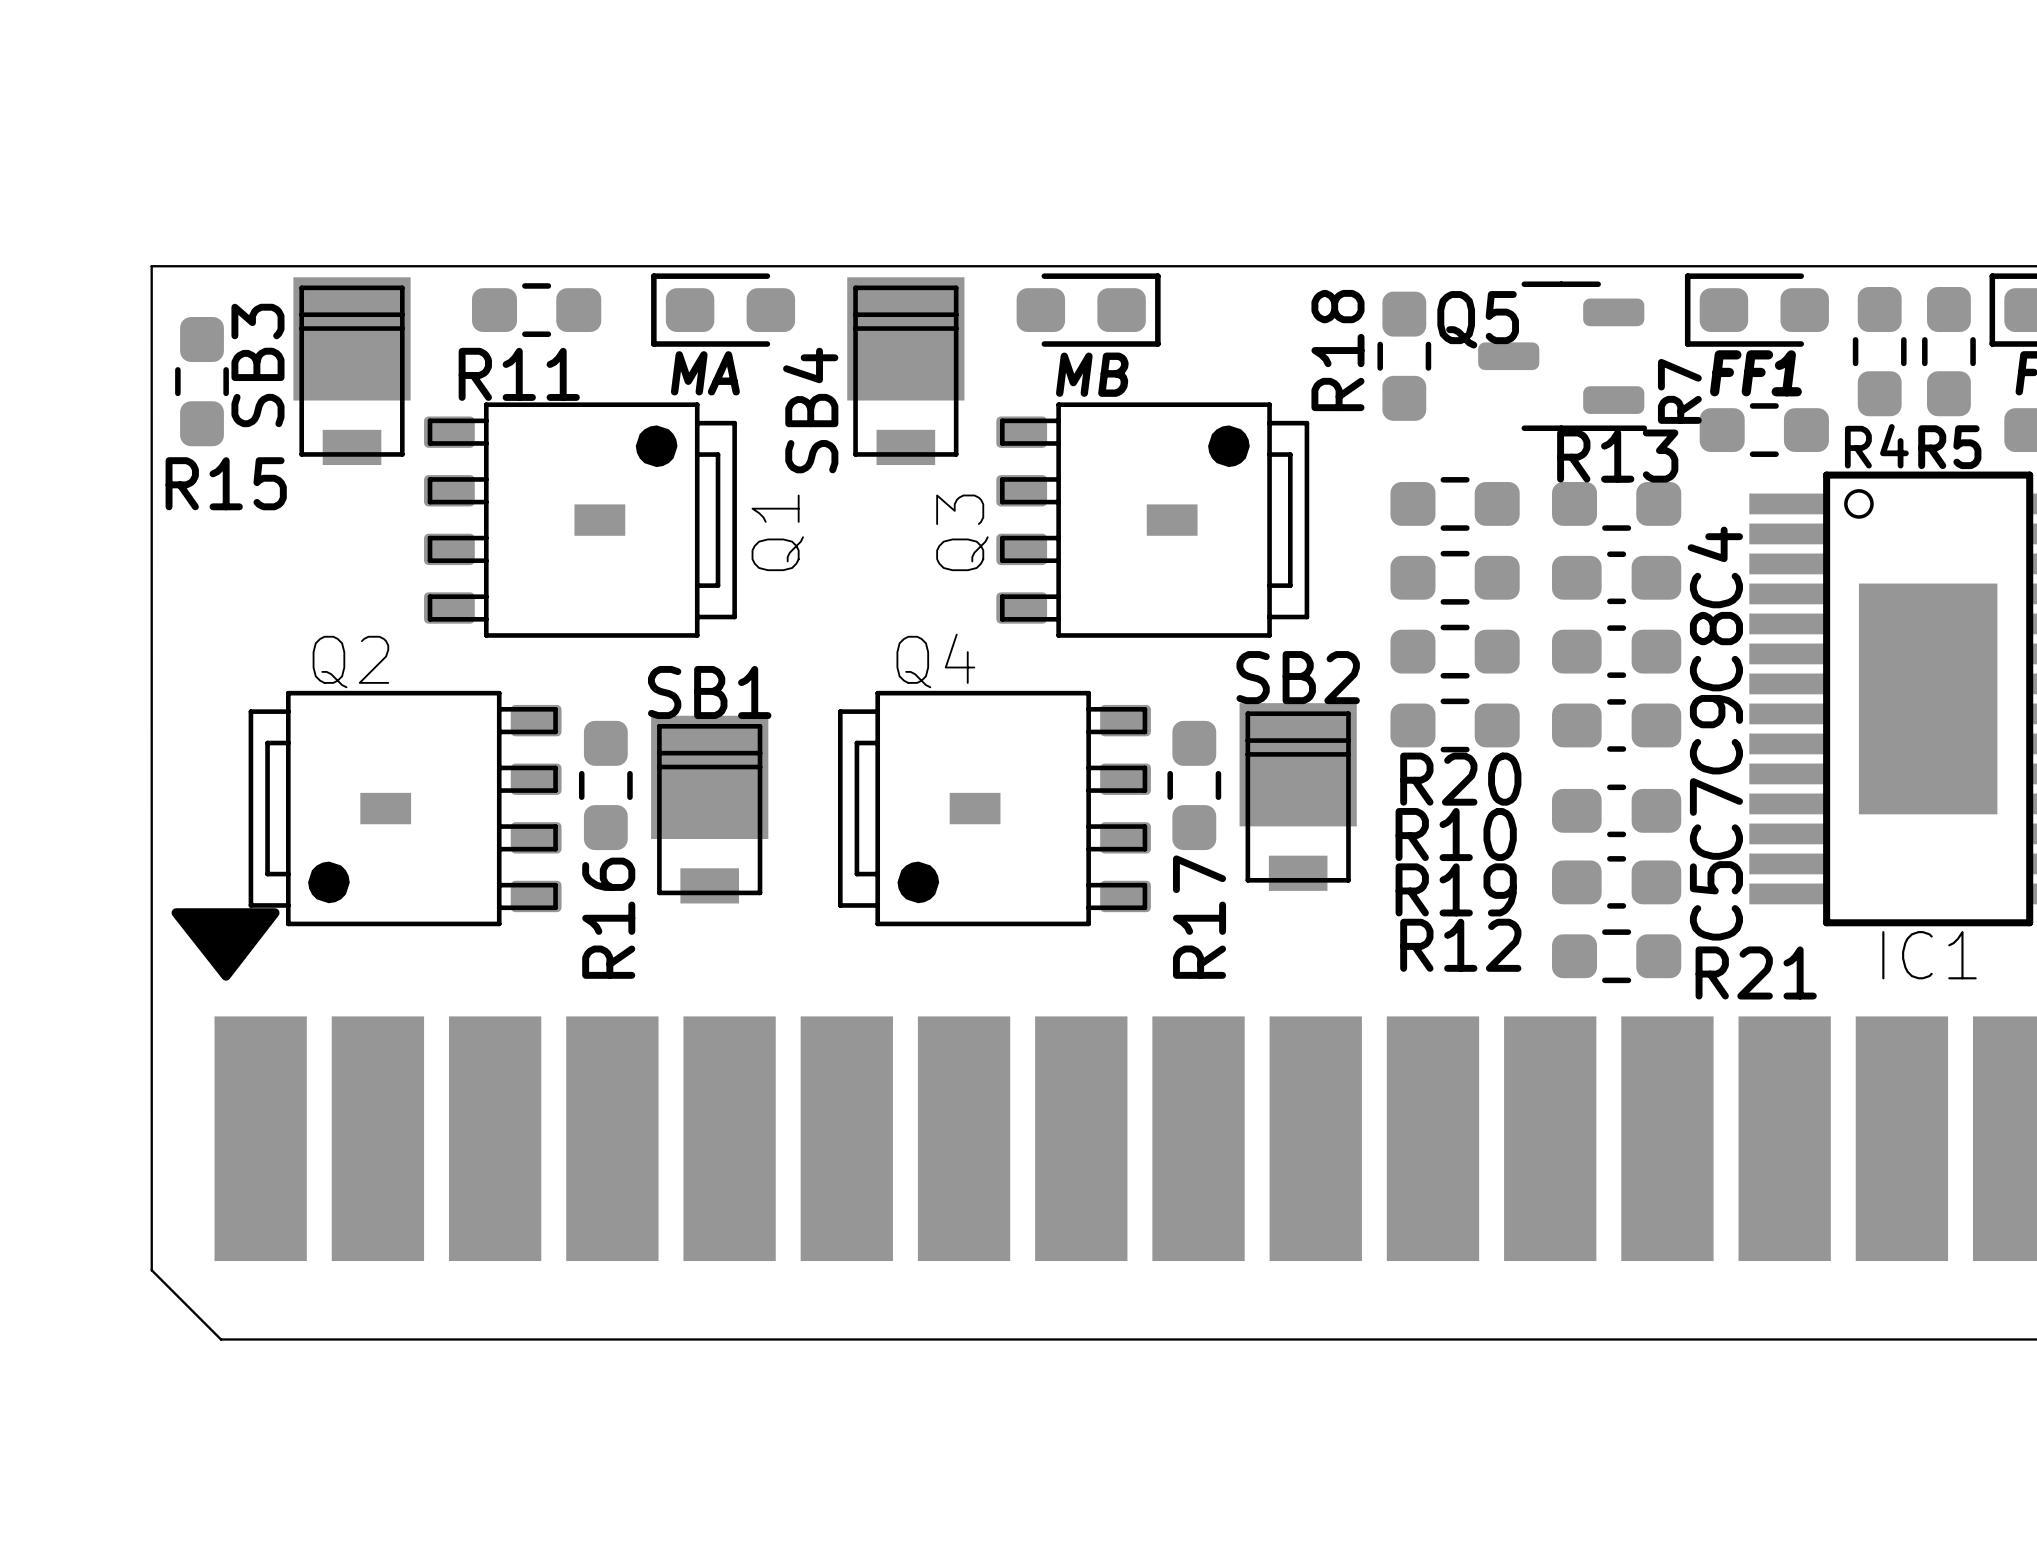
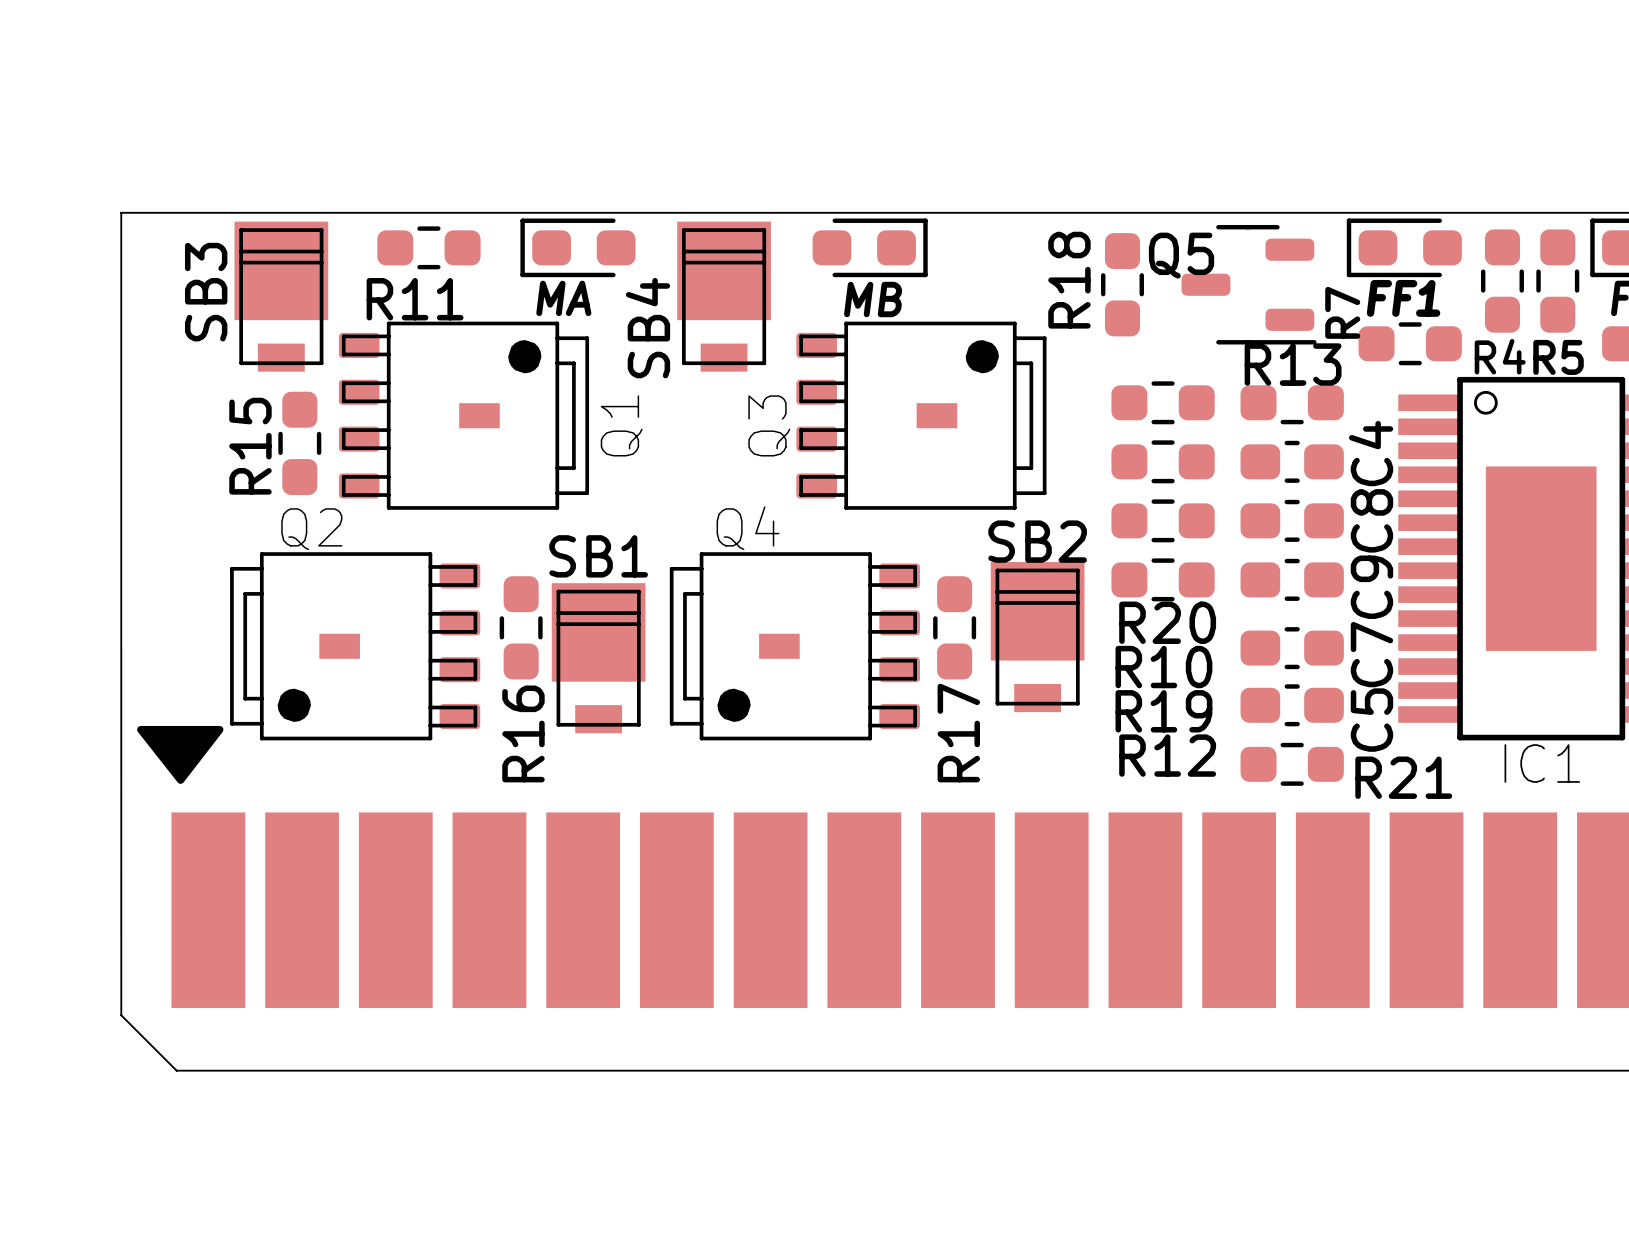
R15 position: (202, 381) -> (299, 443)
R15 name rotation: 0° (226, 483) -> 90° counterclockwise (250, 446)
SB1 name position: SB1 (709, 692) -> SB1 (598, 556)
R16 position: (605, 785) -> (521, 627)
Q2 position: (405, 808) -> (355, 646)
SB1 position: (709, 809) -> (598, 658)

